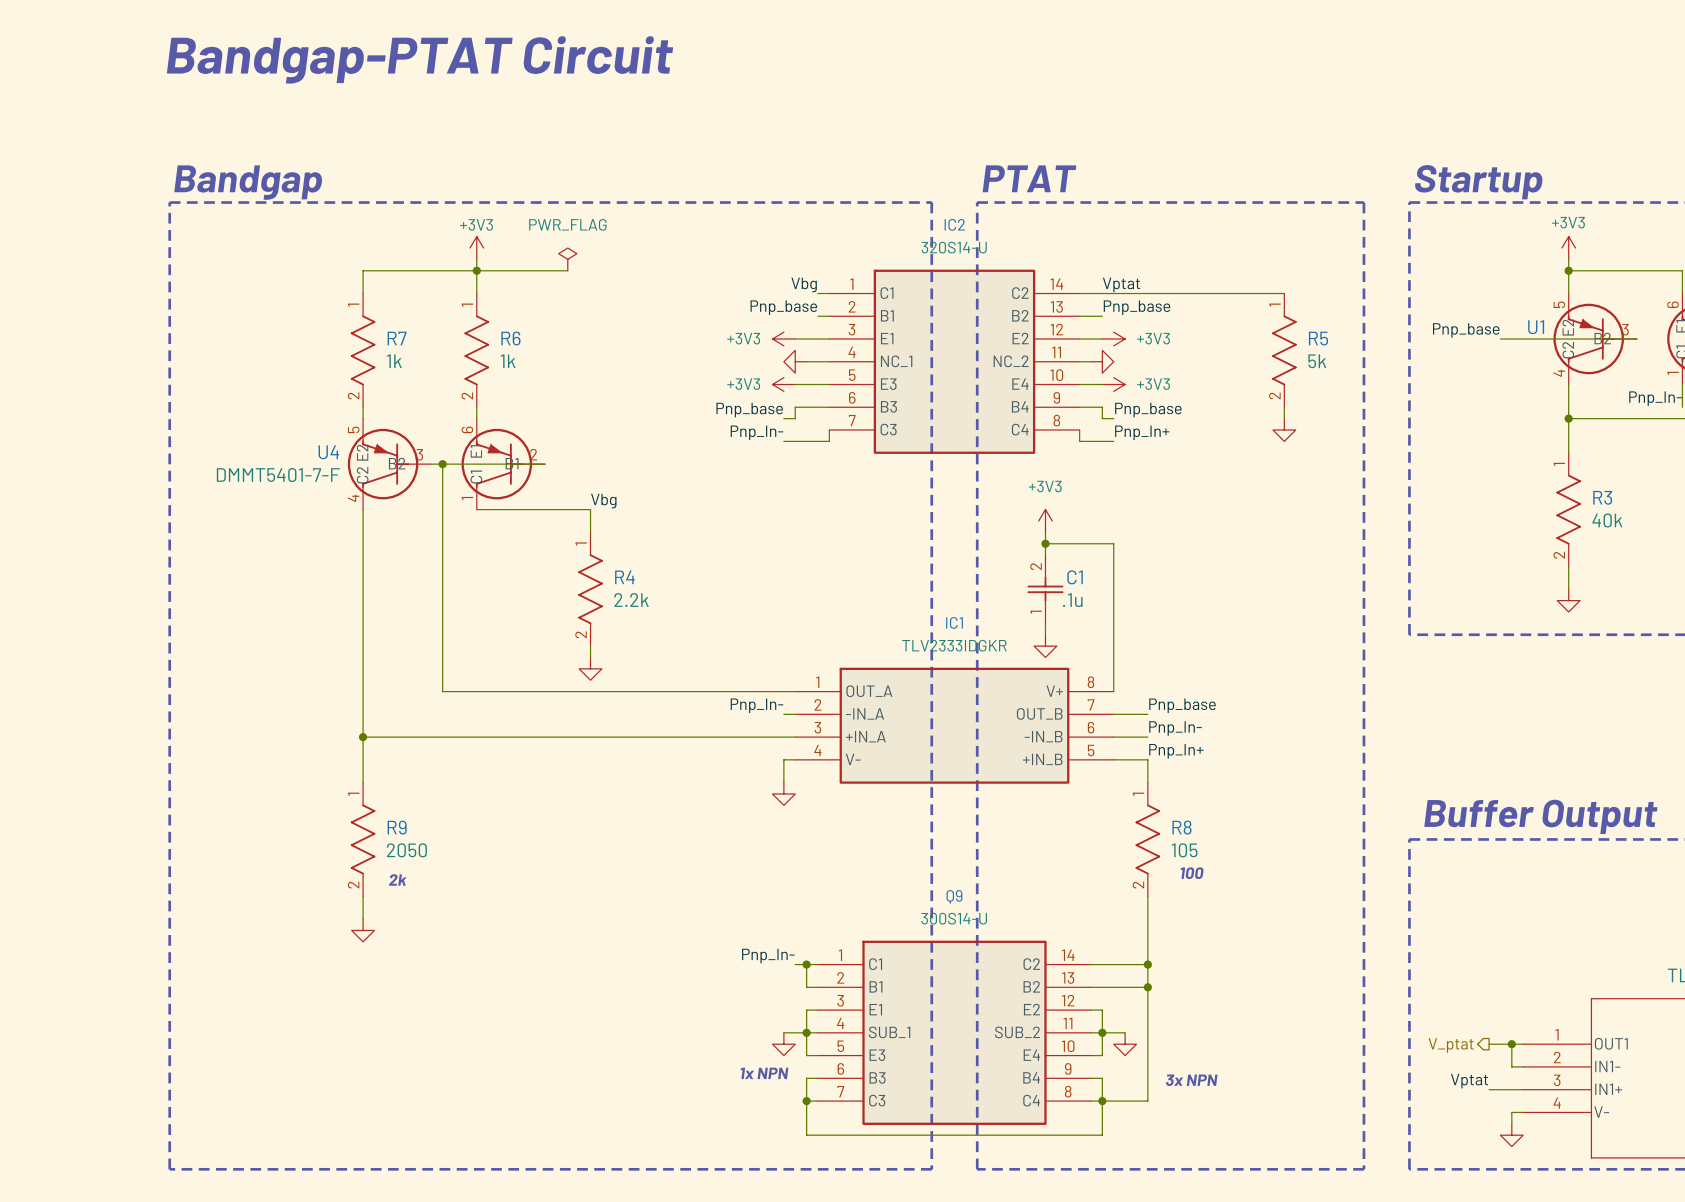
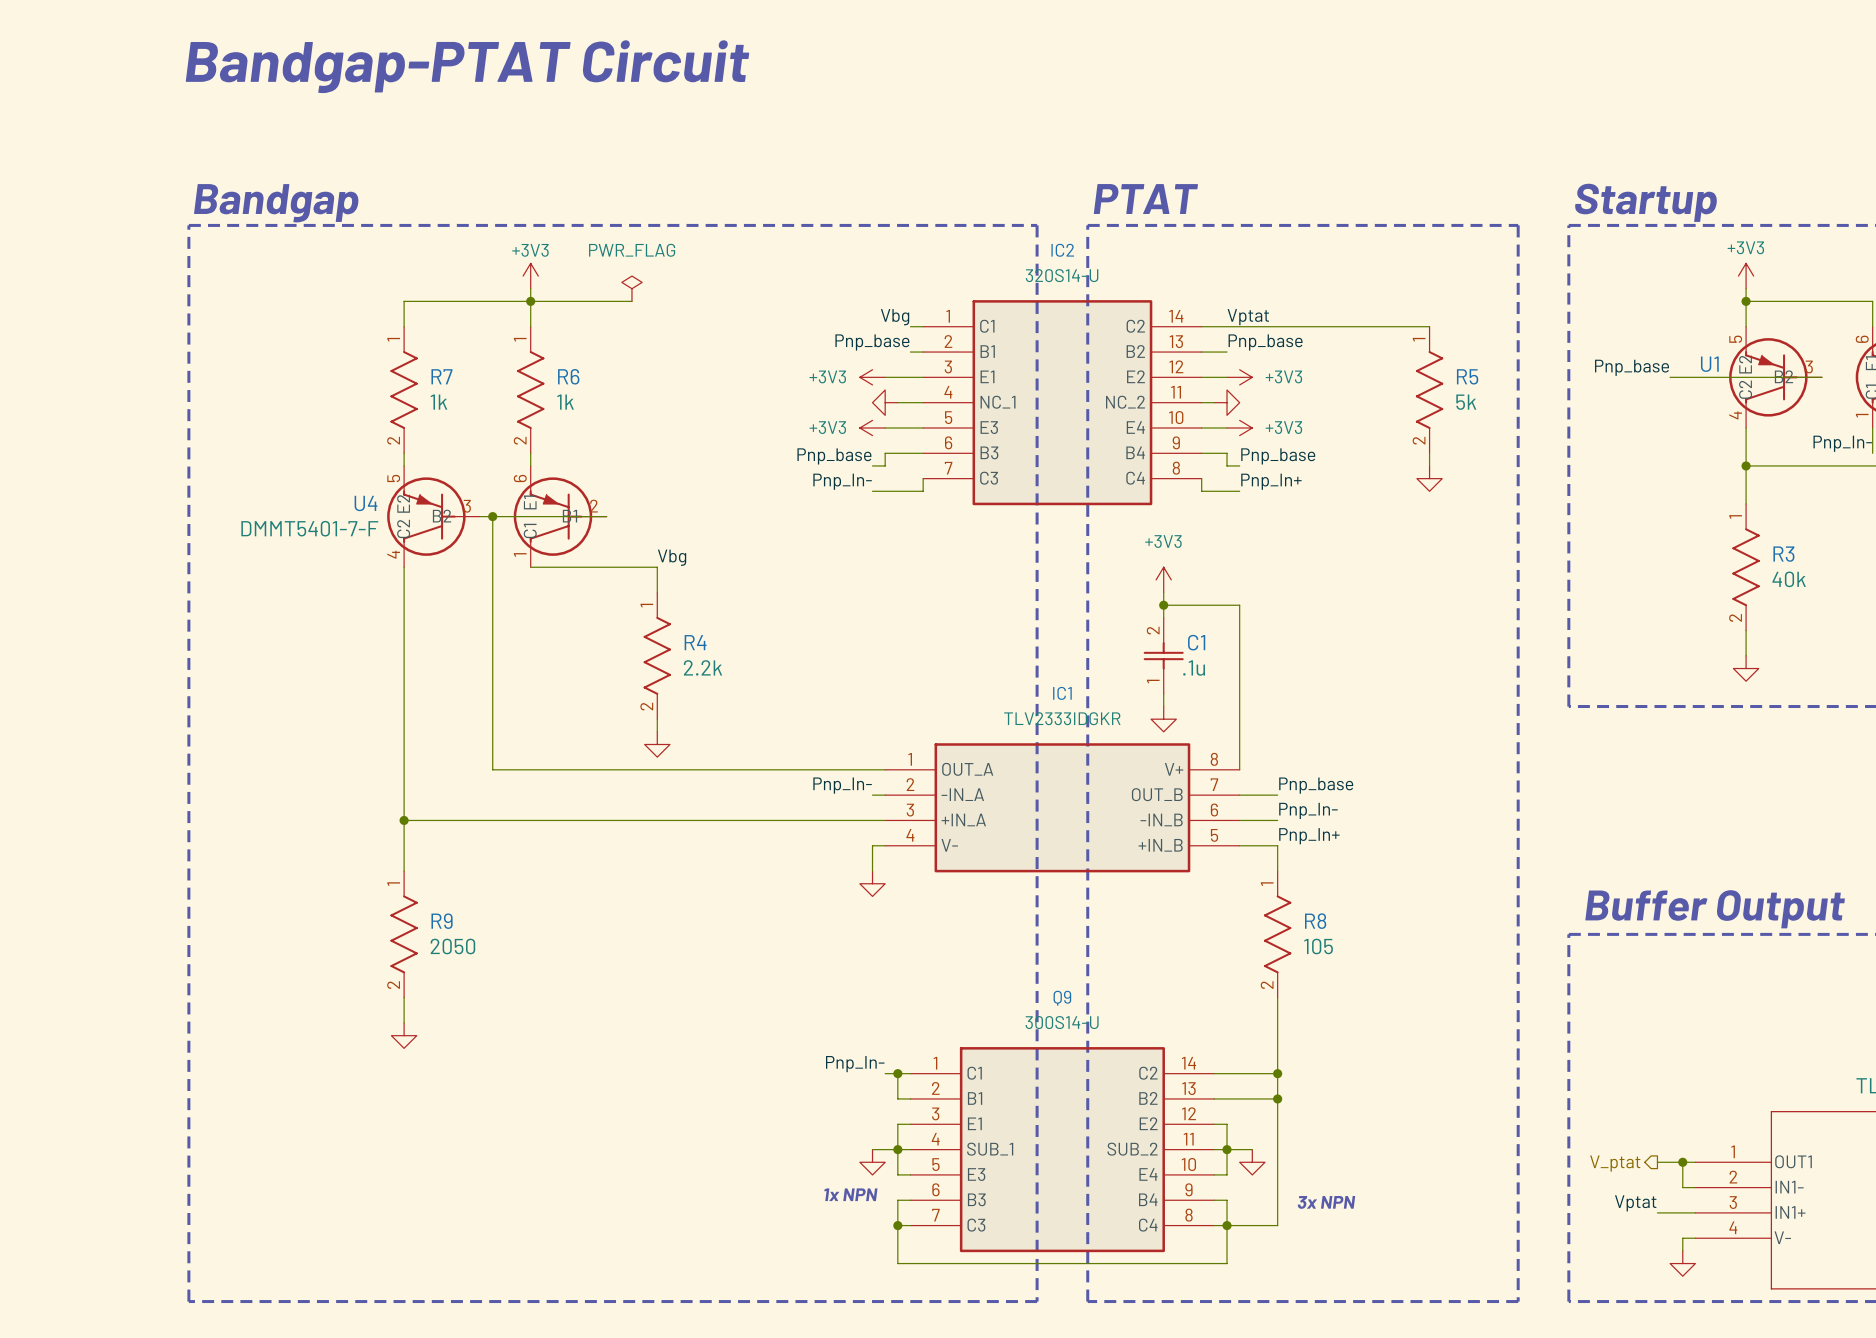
text: 100 (1192, 873) -> none
text: 2k (397, 879) -> none

